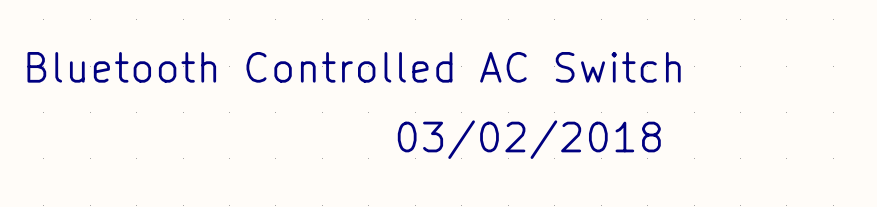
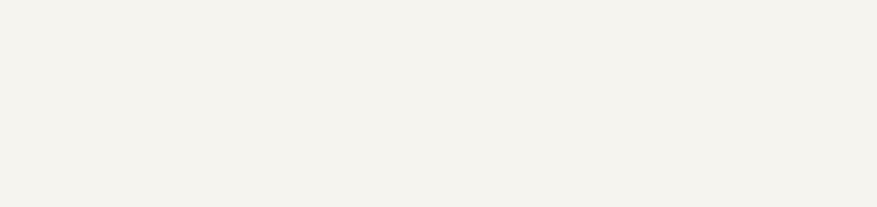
text: Bluetooth Controlled AC Switch (354, 67) -> none
text: 03/02/2018 (529, 139) -> none

